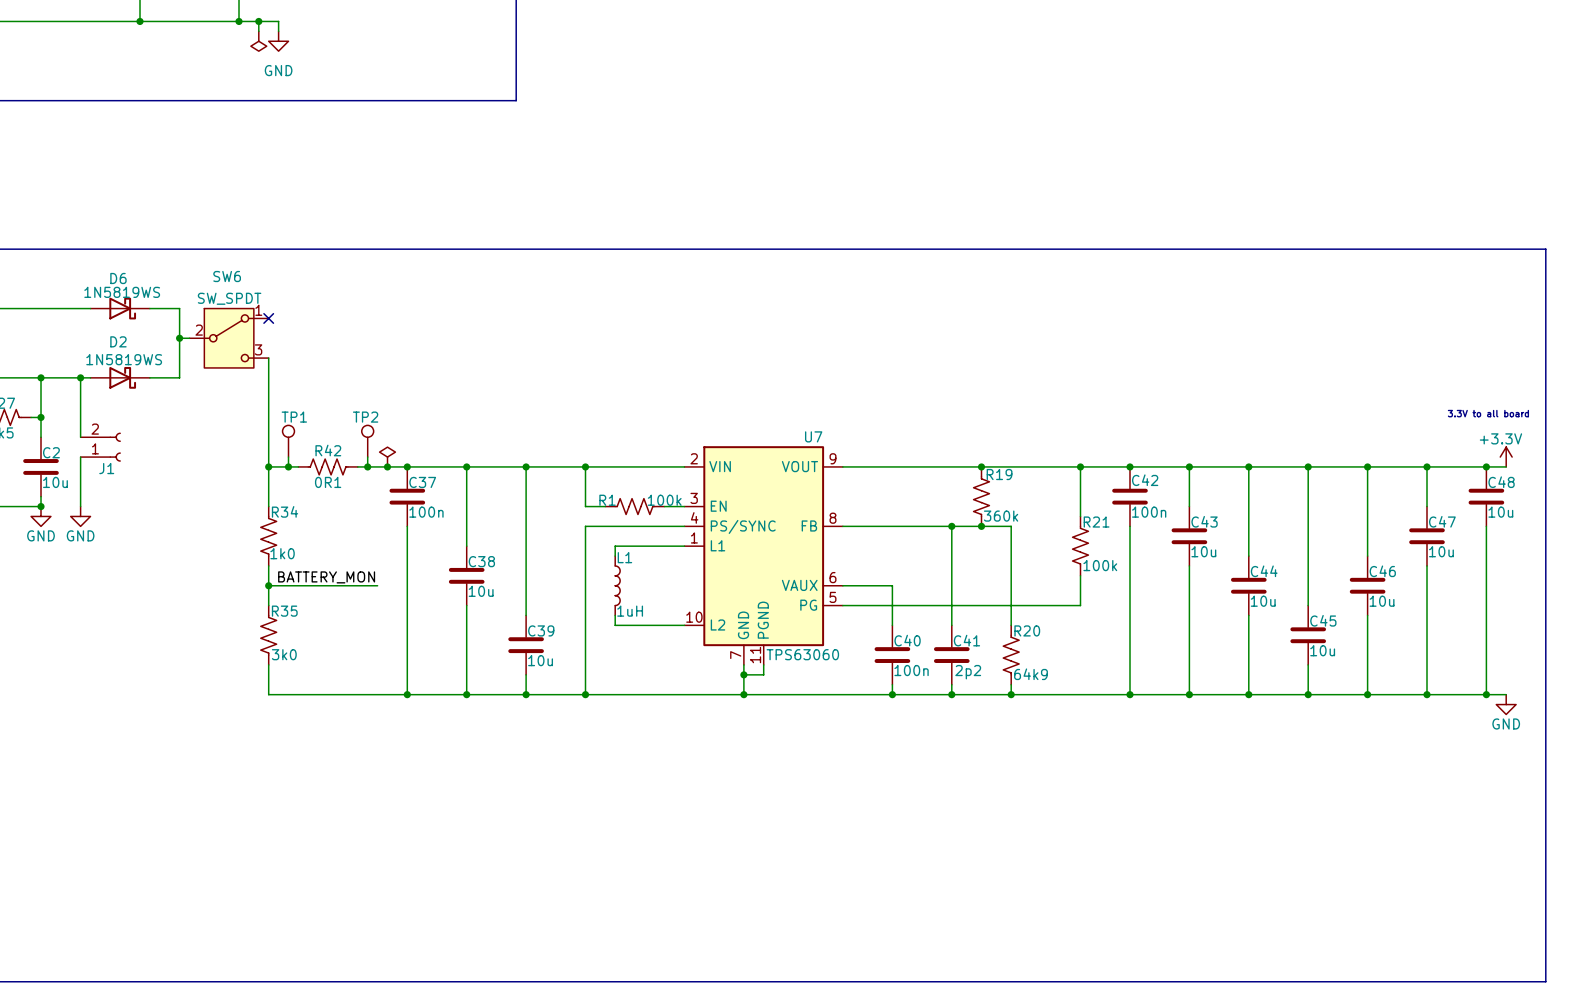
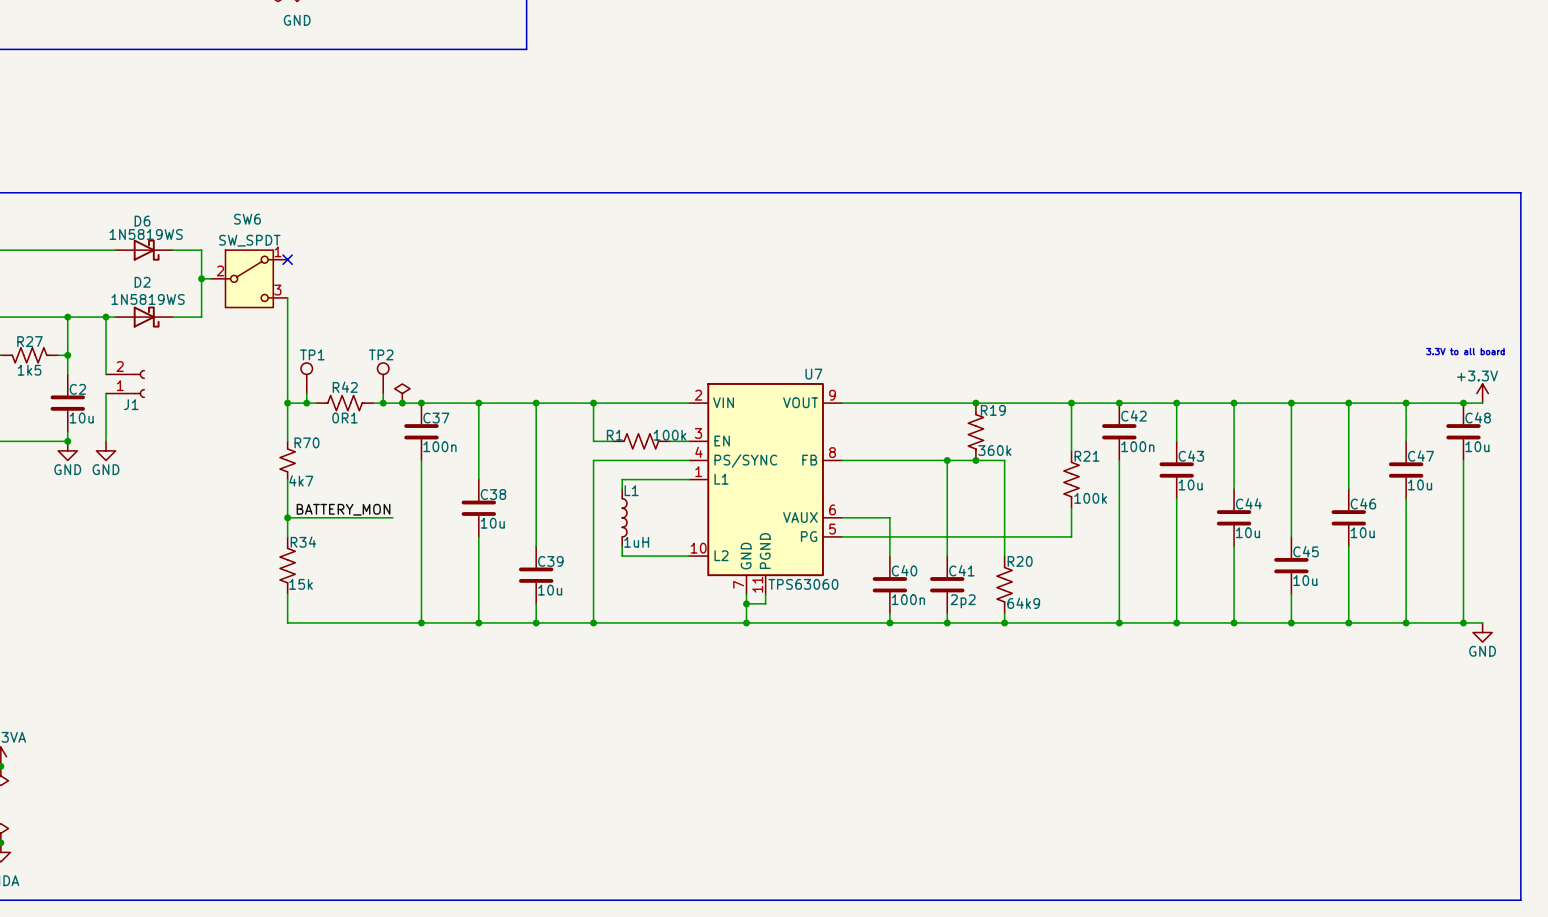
R70: none -> 4k7 (287, 460)
R34: 1k0 (268, 536) -> none
R35 name: R35 (284, 611) -> R34 (303, 542)
R35 value: 3k0 (284, 654) -> 15k (301, 584)

